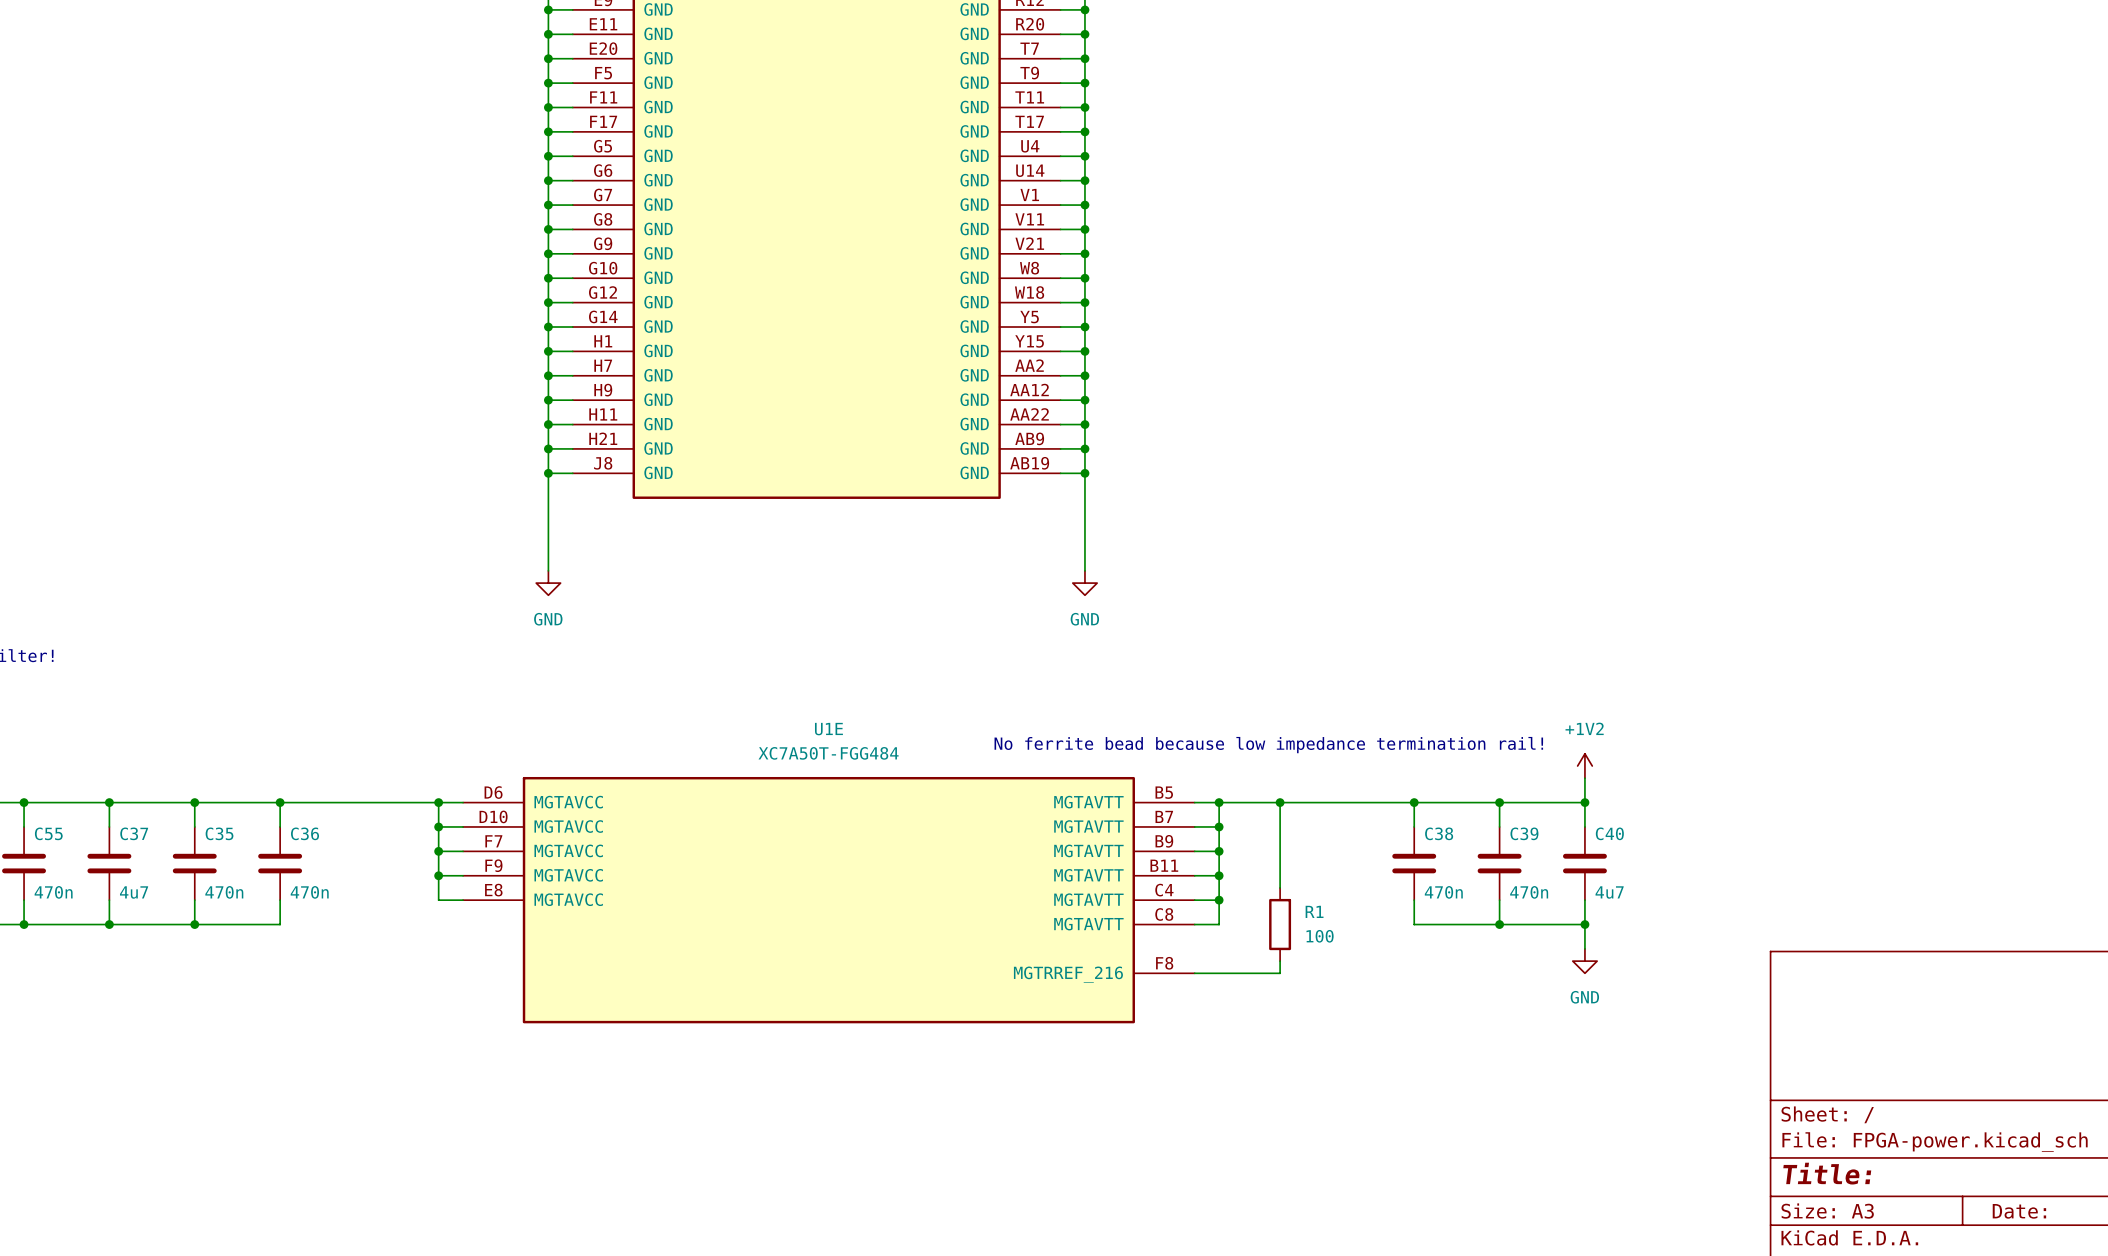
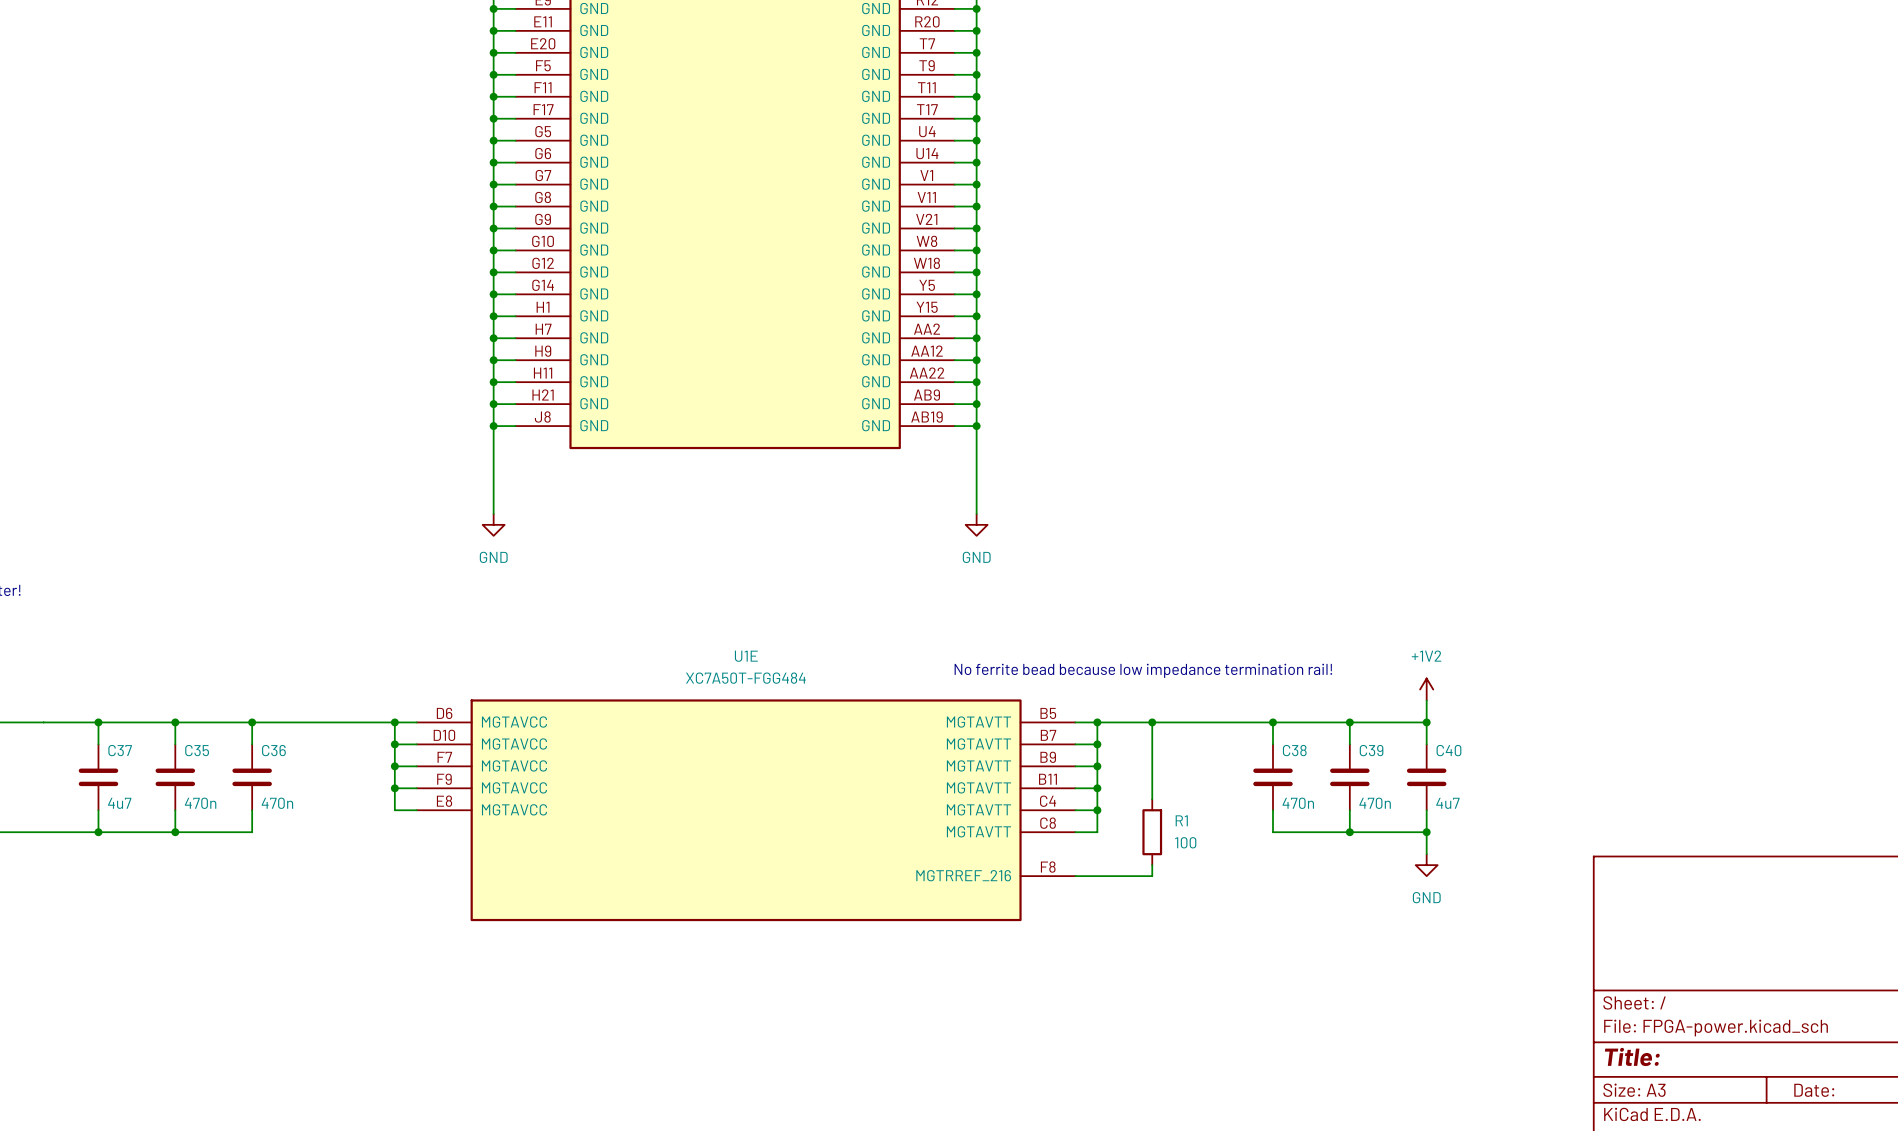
wire: (24, 802) (24, 826) -> none
junction: (24, 802) -> none
C55: 470n (24, 863) -> none
wire: (24, 900) (24, 924) -> none
junction: (24, 924) -> none

